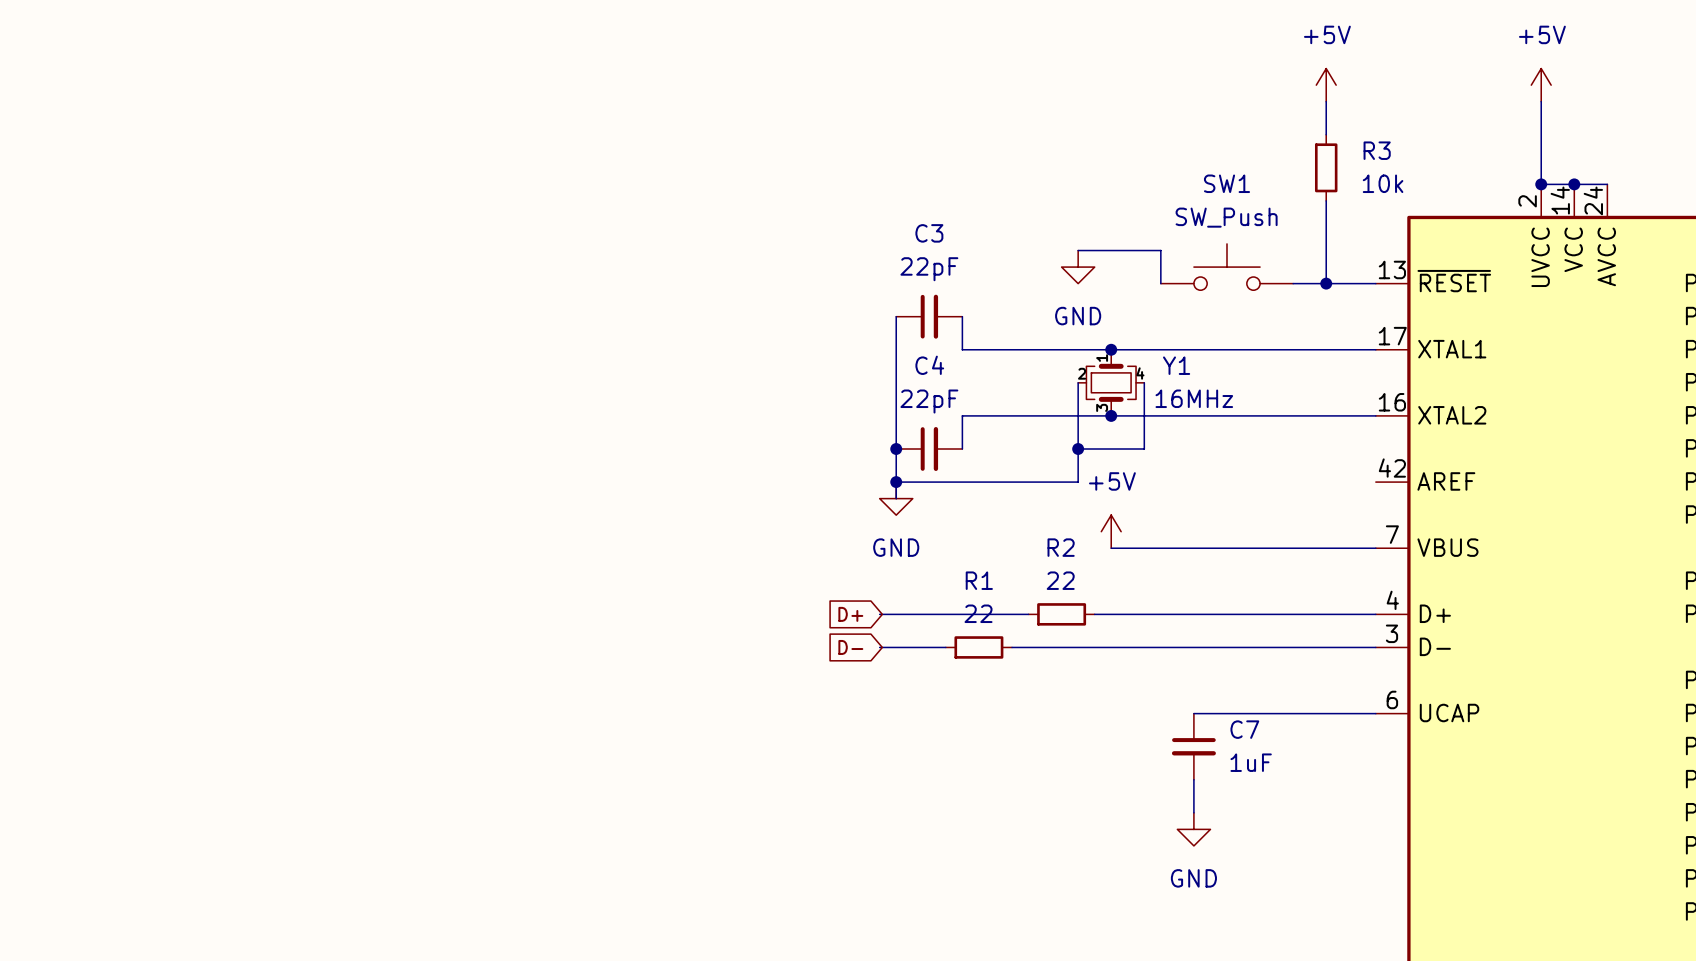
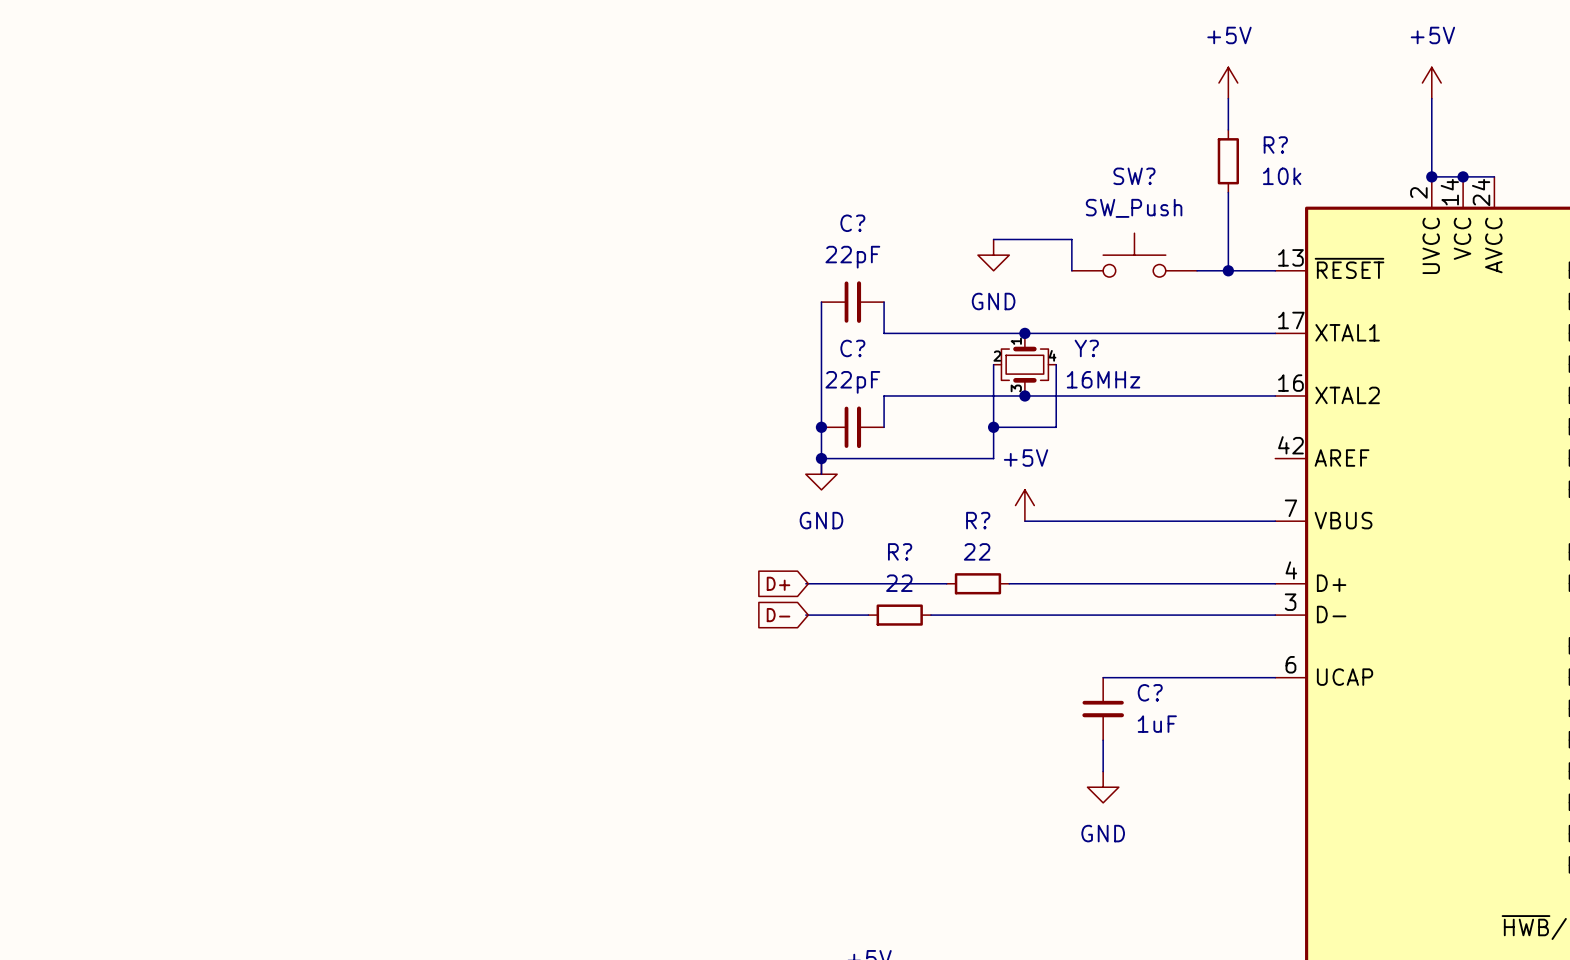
R3 name: R3 (1377, 150) -> R? (1275, 145)
SW1 name: SW1 (1226, 183) -> SW? (1134, 176)
C3 name: C3 (929, 233) -> C? (852, 223)
C4 name: C4 (929, 365) -> C? (852, 348)
Y1 name: Y1 (1176, 365) -> Y? (1086, 348)
R2 name: R2 (1061, 547) -> R? (978, 520)
R1 name: R1 (979, 580) -> R? (900, 551)
C7 name: C7 (1244, 729) -> C? (1150, 692)

